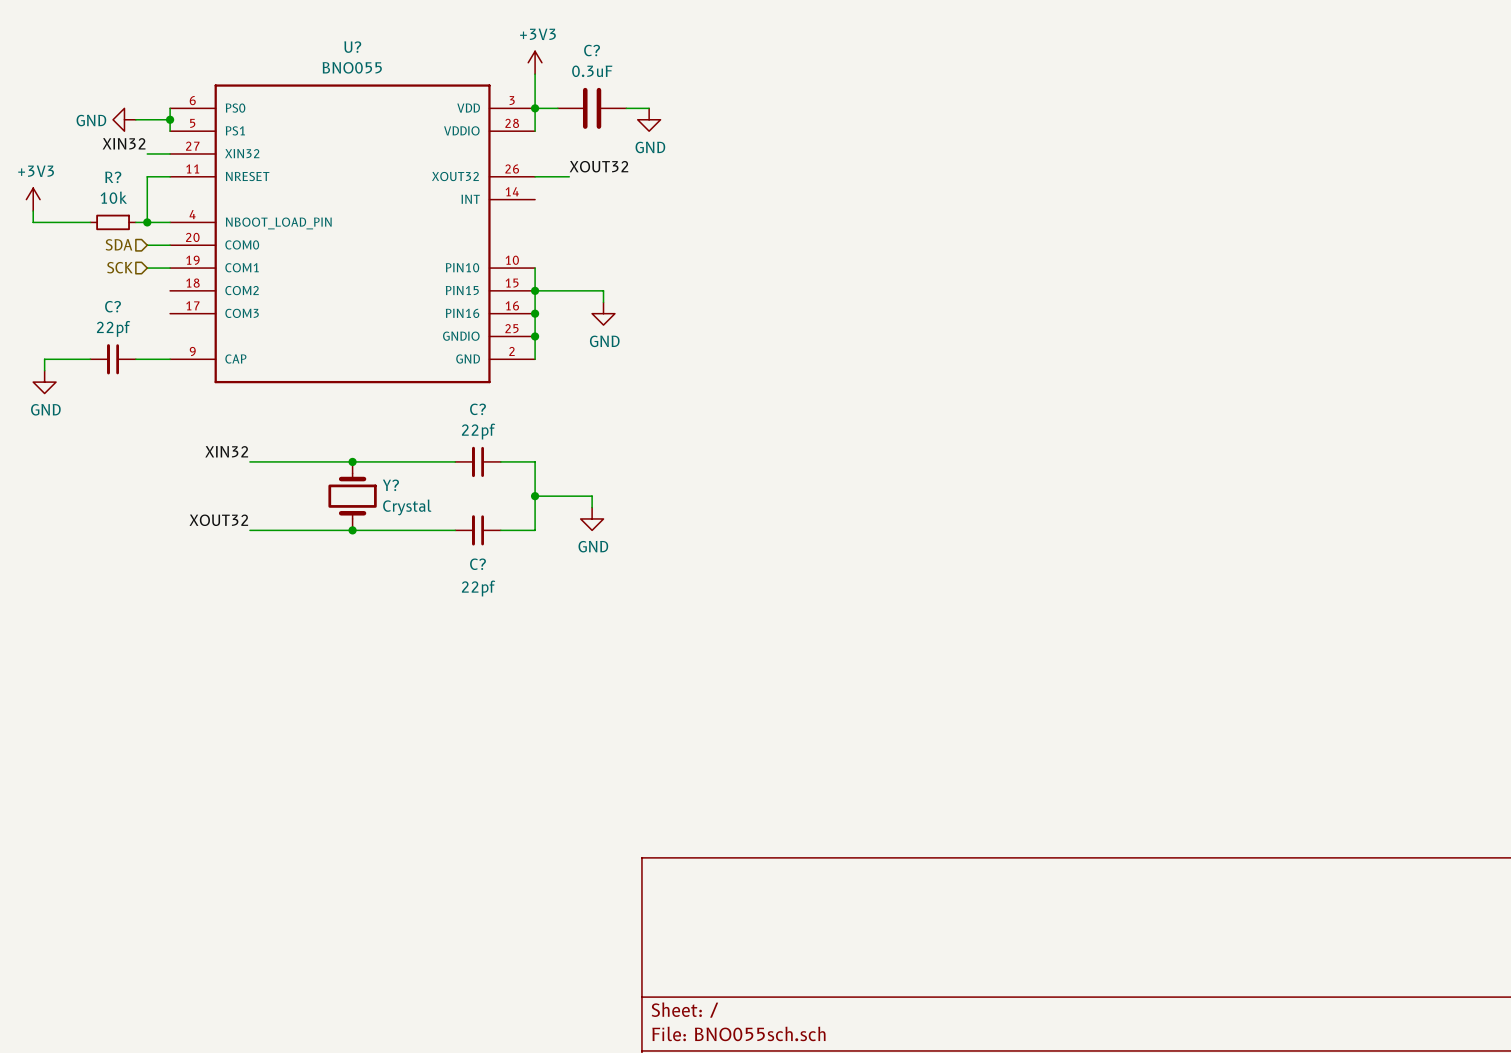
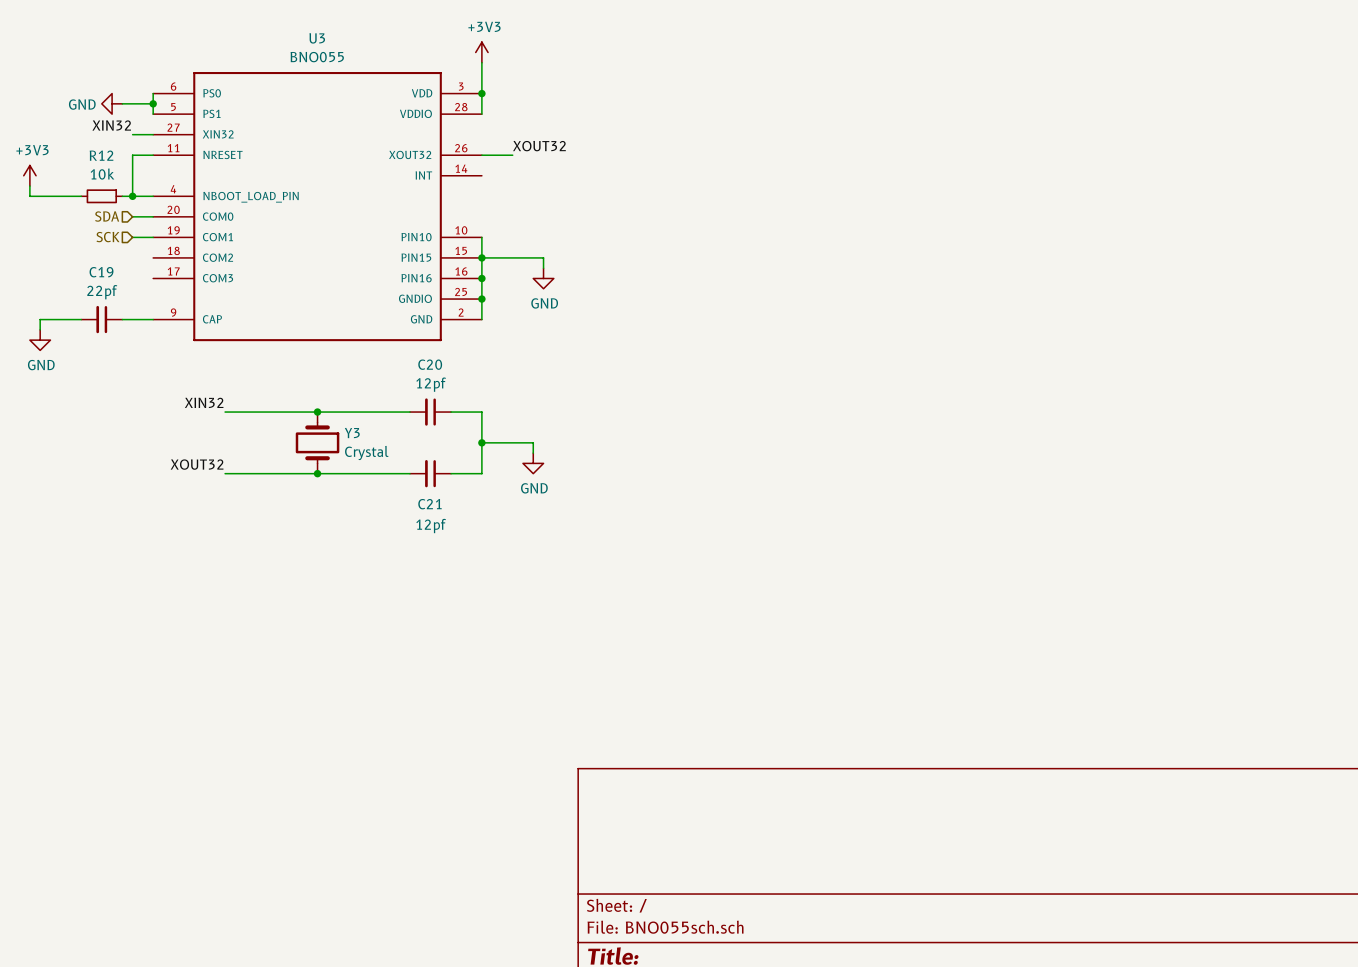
U? name: U? (352, 47) -> U3 (317, 38)
wire: (535, 108) (557, 108) -> none
C?: 0.3uF (592, 108) -> none
wire: (626, 108) (649, 108) -> none
power symbol: GND (649, 119) -> none
R? name: R? (113, 177) -> R12 (101, 155)
C? name: C? (113, 306) -> C19 (101, 272)
C? name: C? (478, 409) -> C20 (430, 364)
C? value: 22pf (478, 431) -> 12pf (431, 384)
Y? name: Y? (390, 485) -> Y3 (352, 433)
C? name: C? (478, 564) -> C21 (429, 504)
C? value: 22pf (478, 588) -> 12pf (431, 526)

